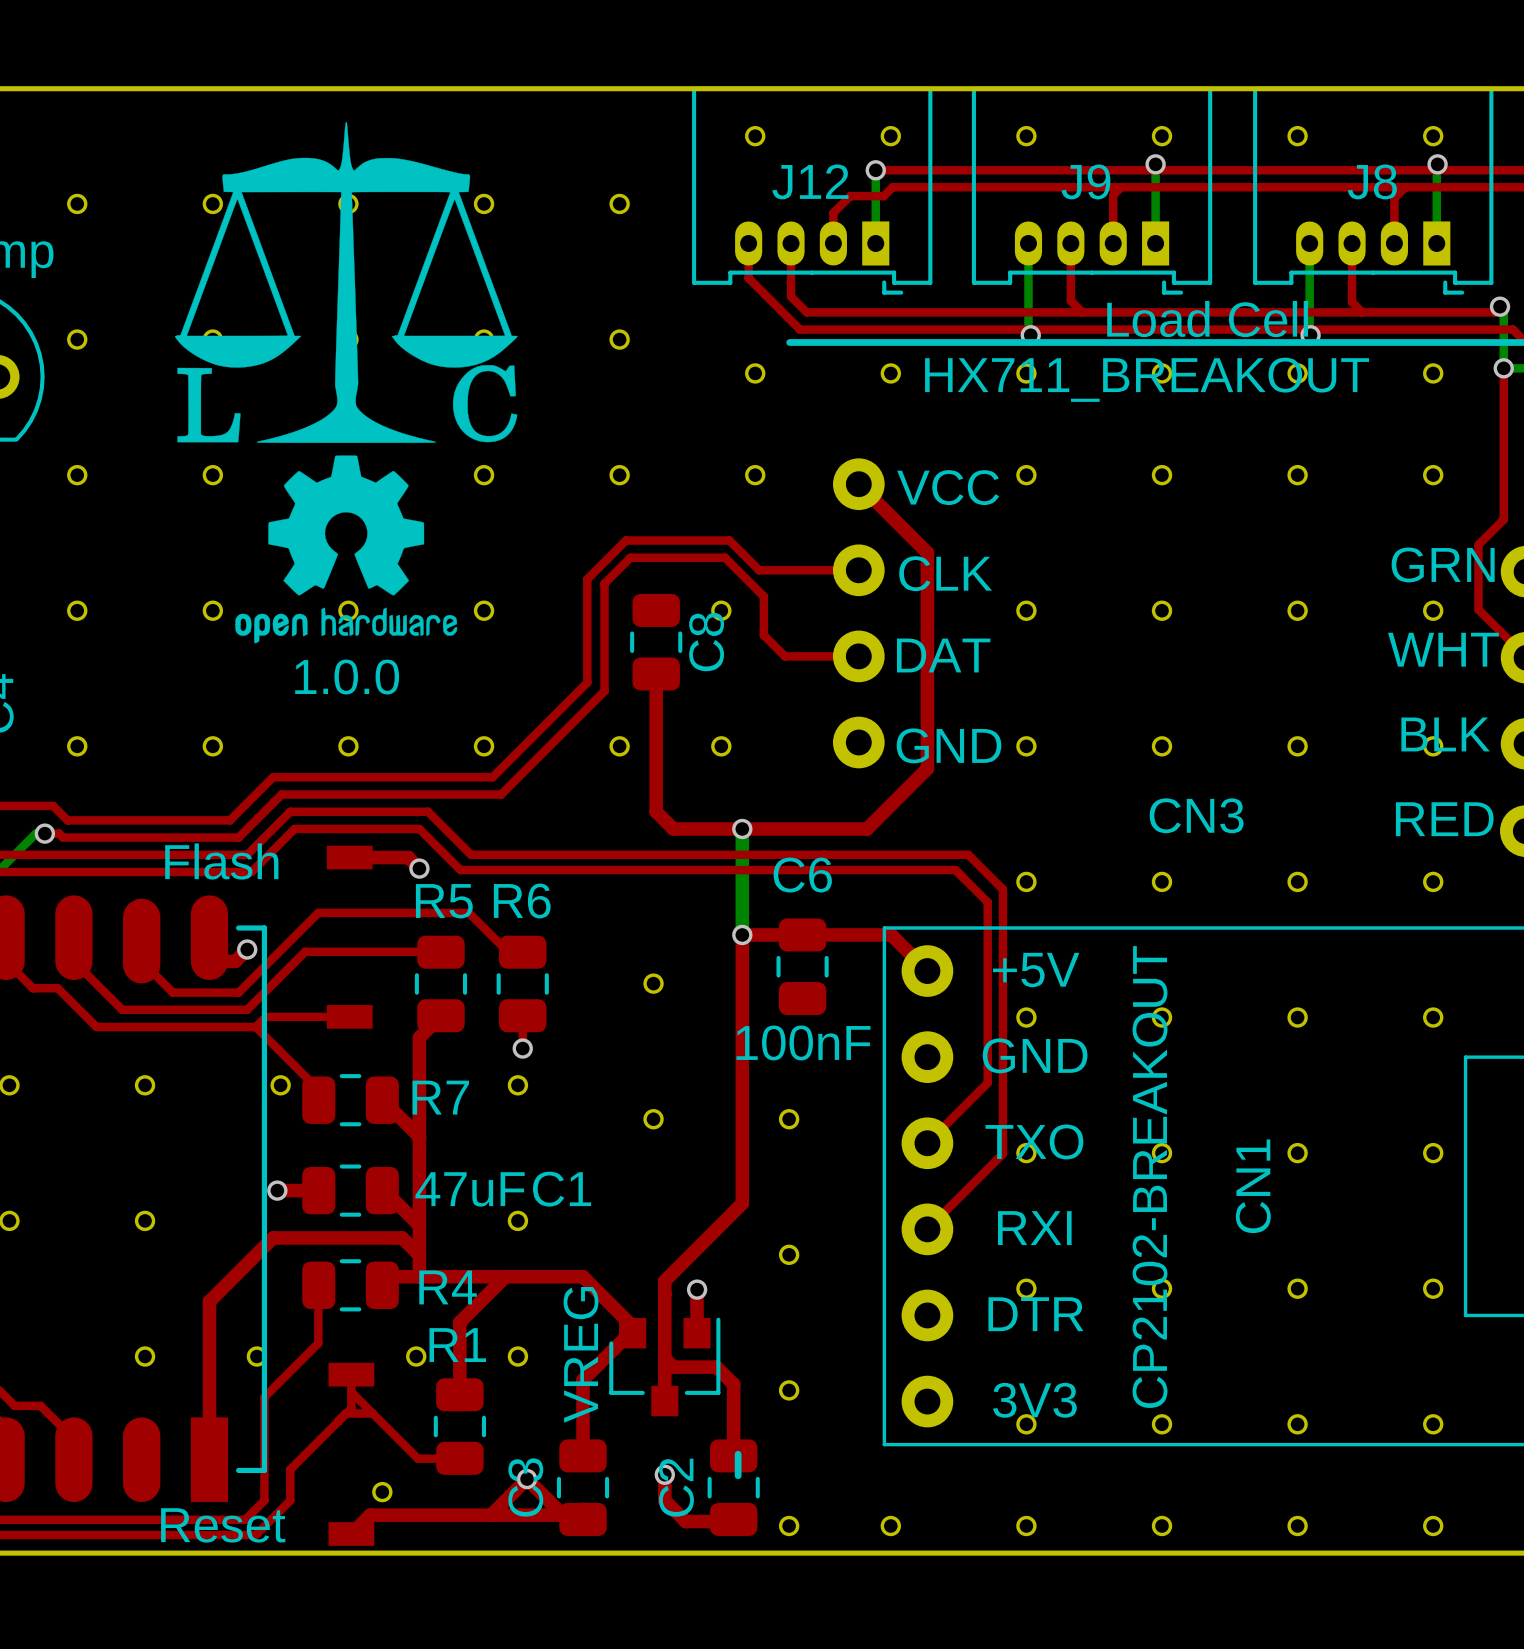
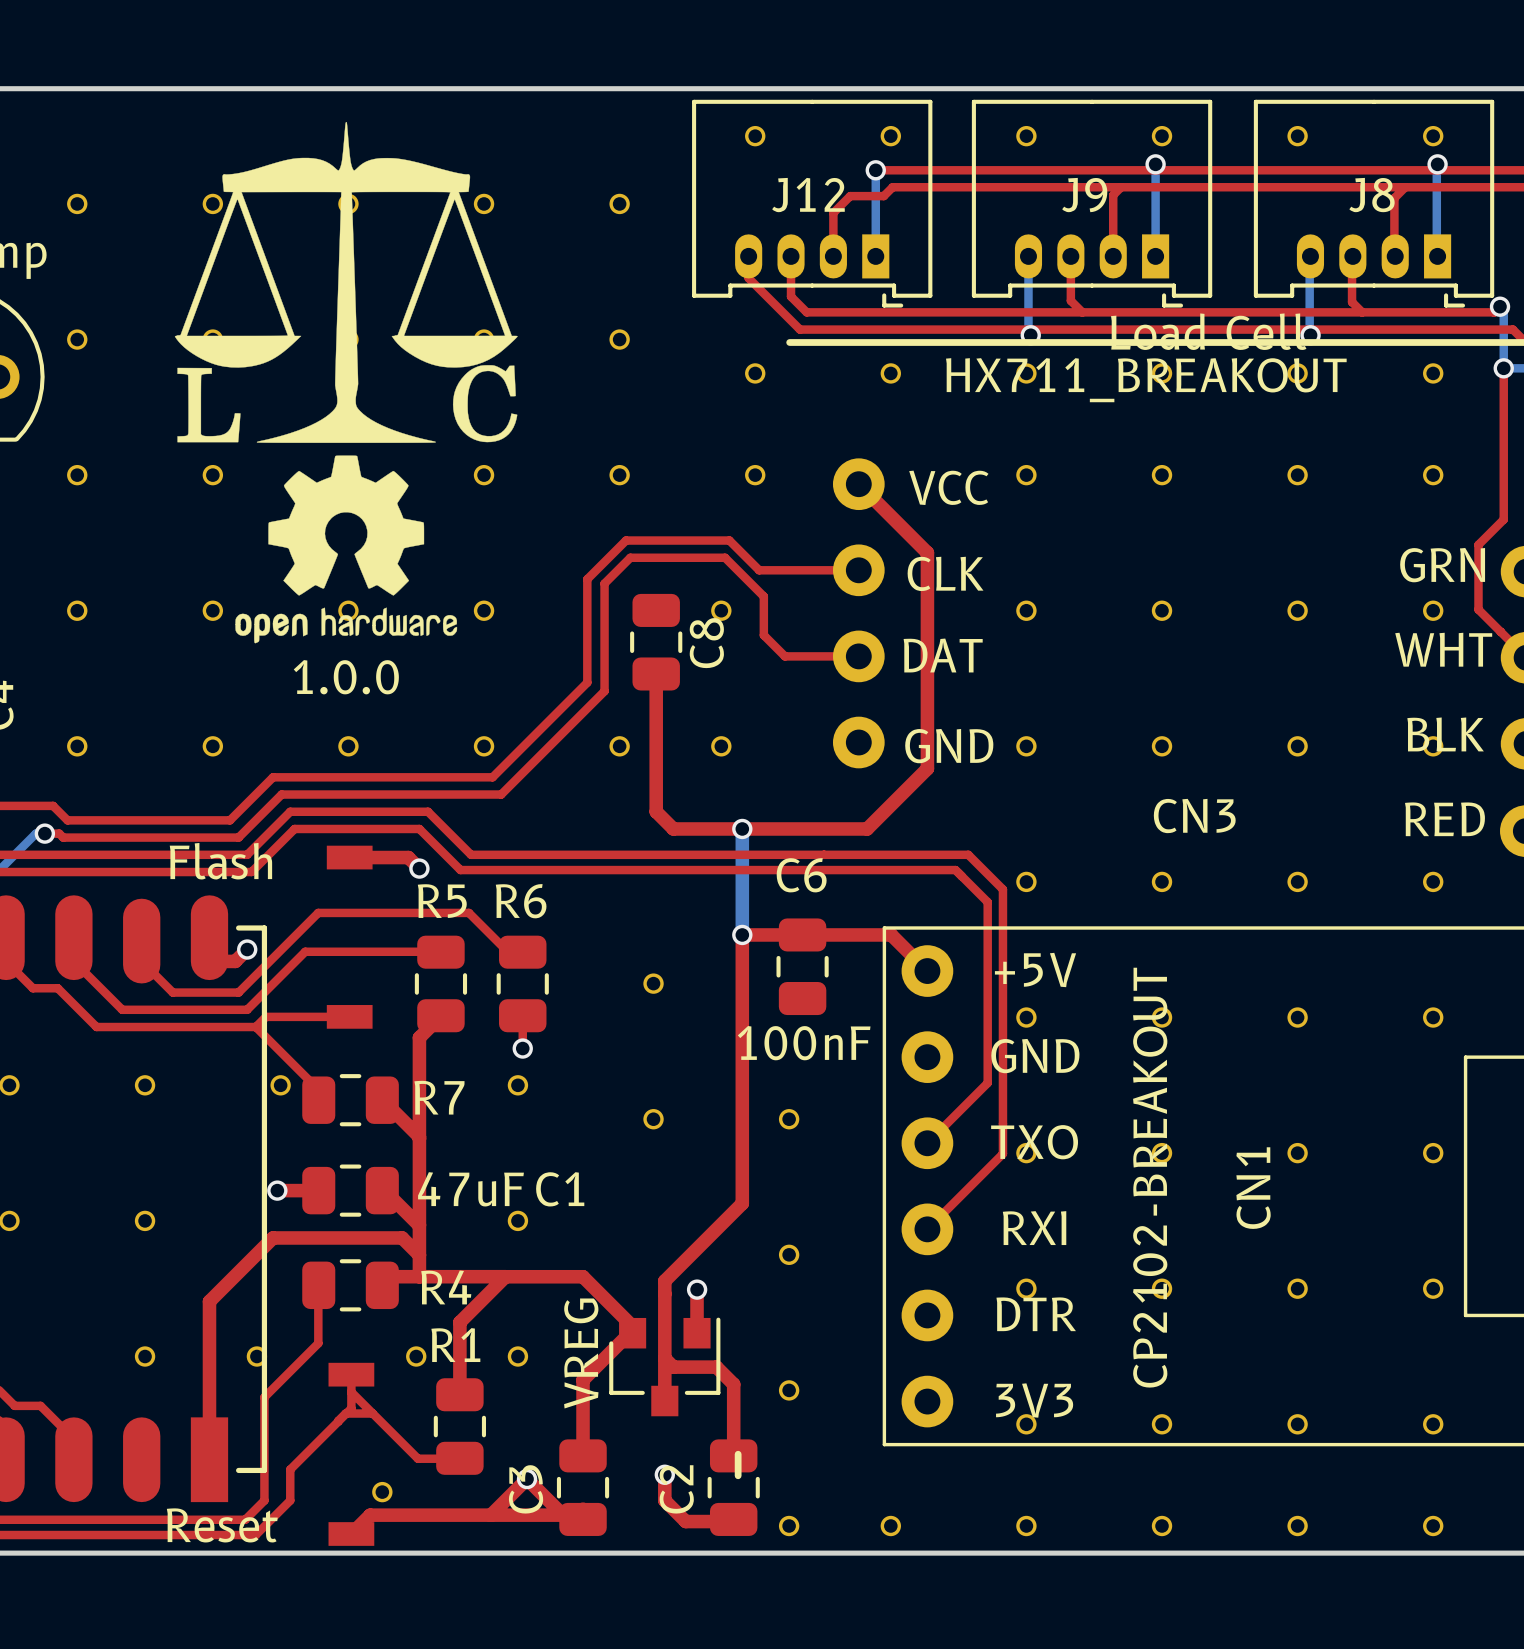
J12 position: (812, 190) -> (812, 203)
J9 position: (1092, 190) -> (1092, 203)
J8 position: (1373, 190) -> (1374, 203)

